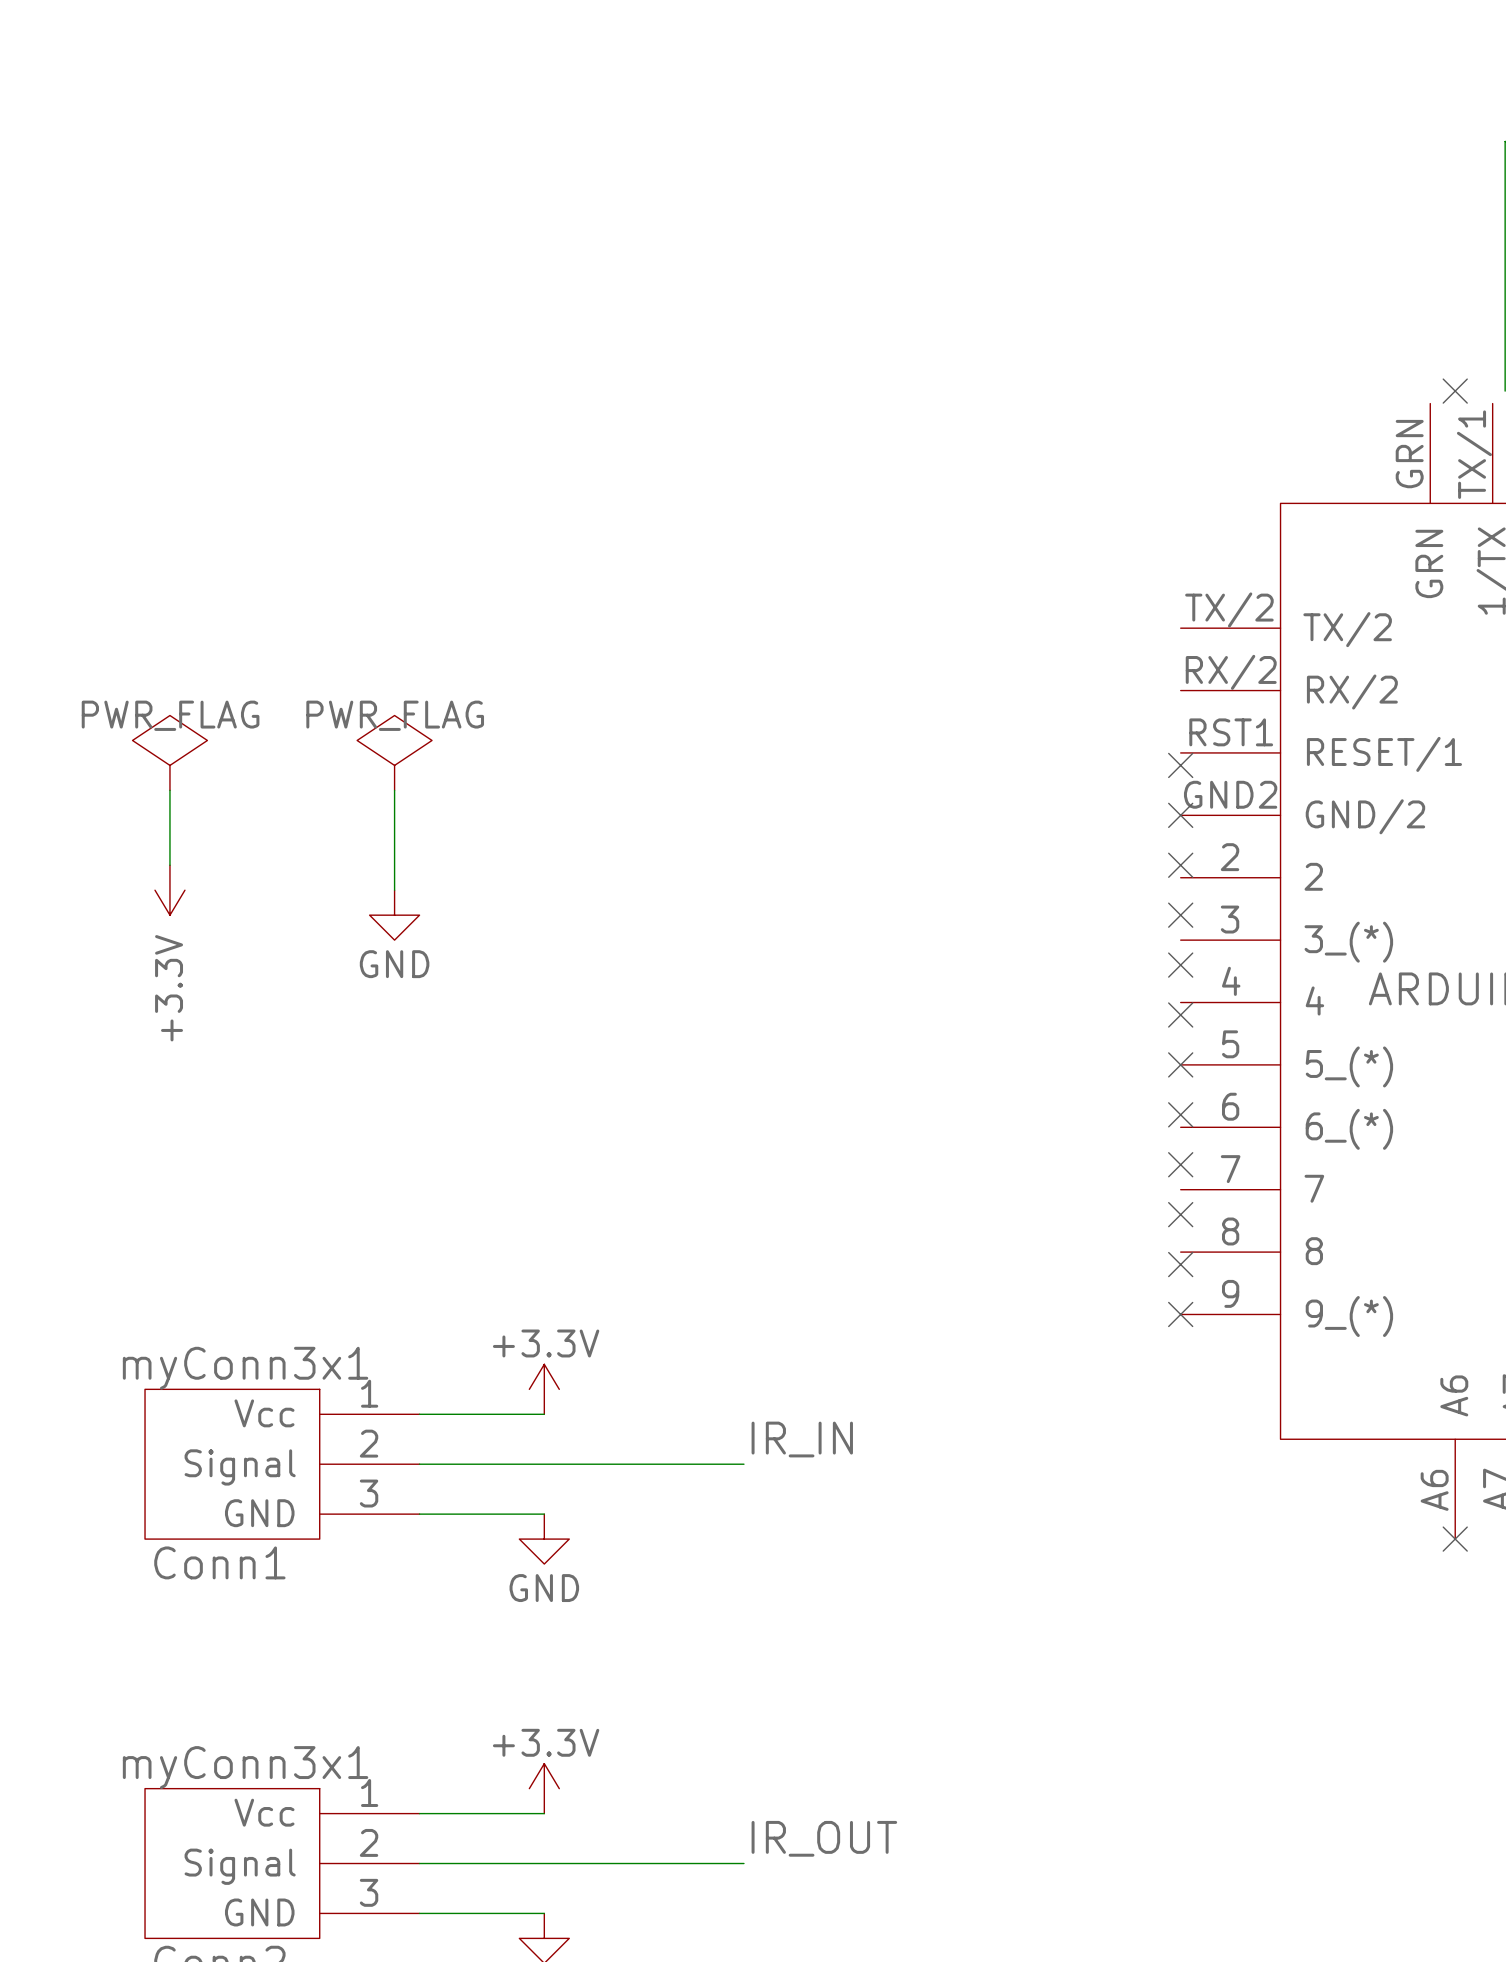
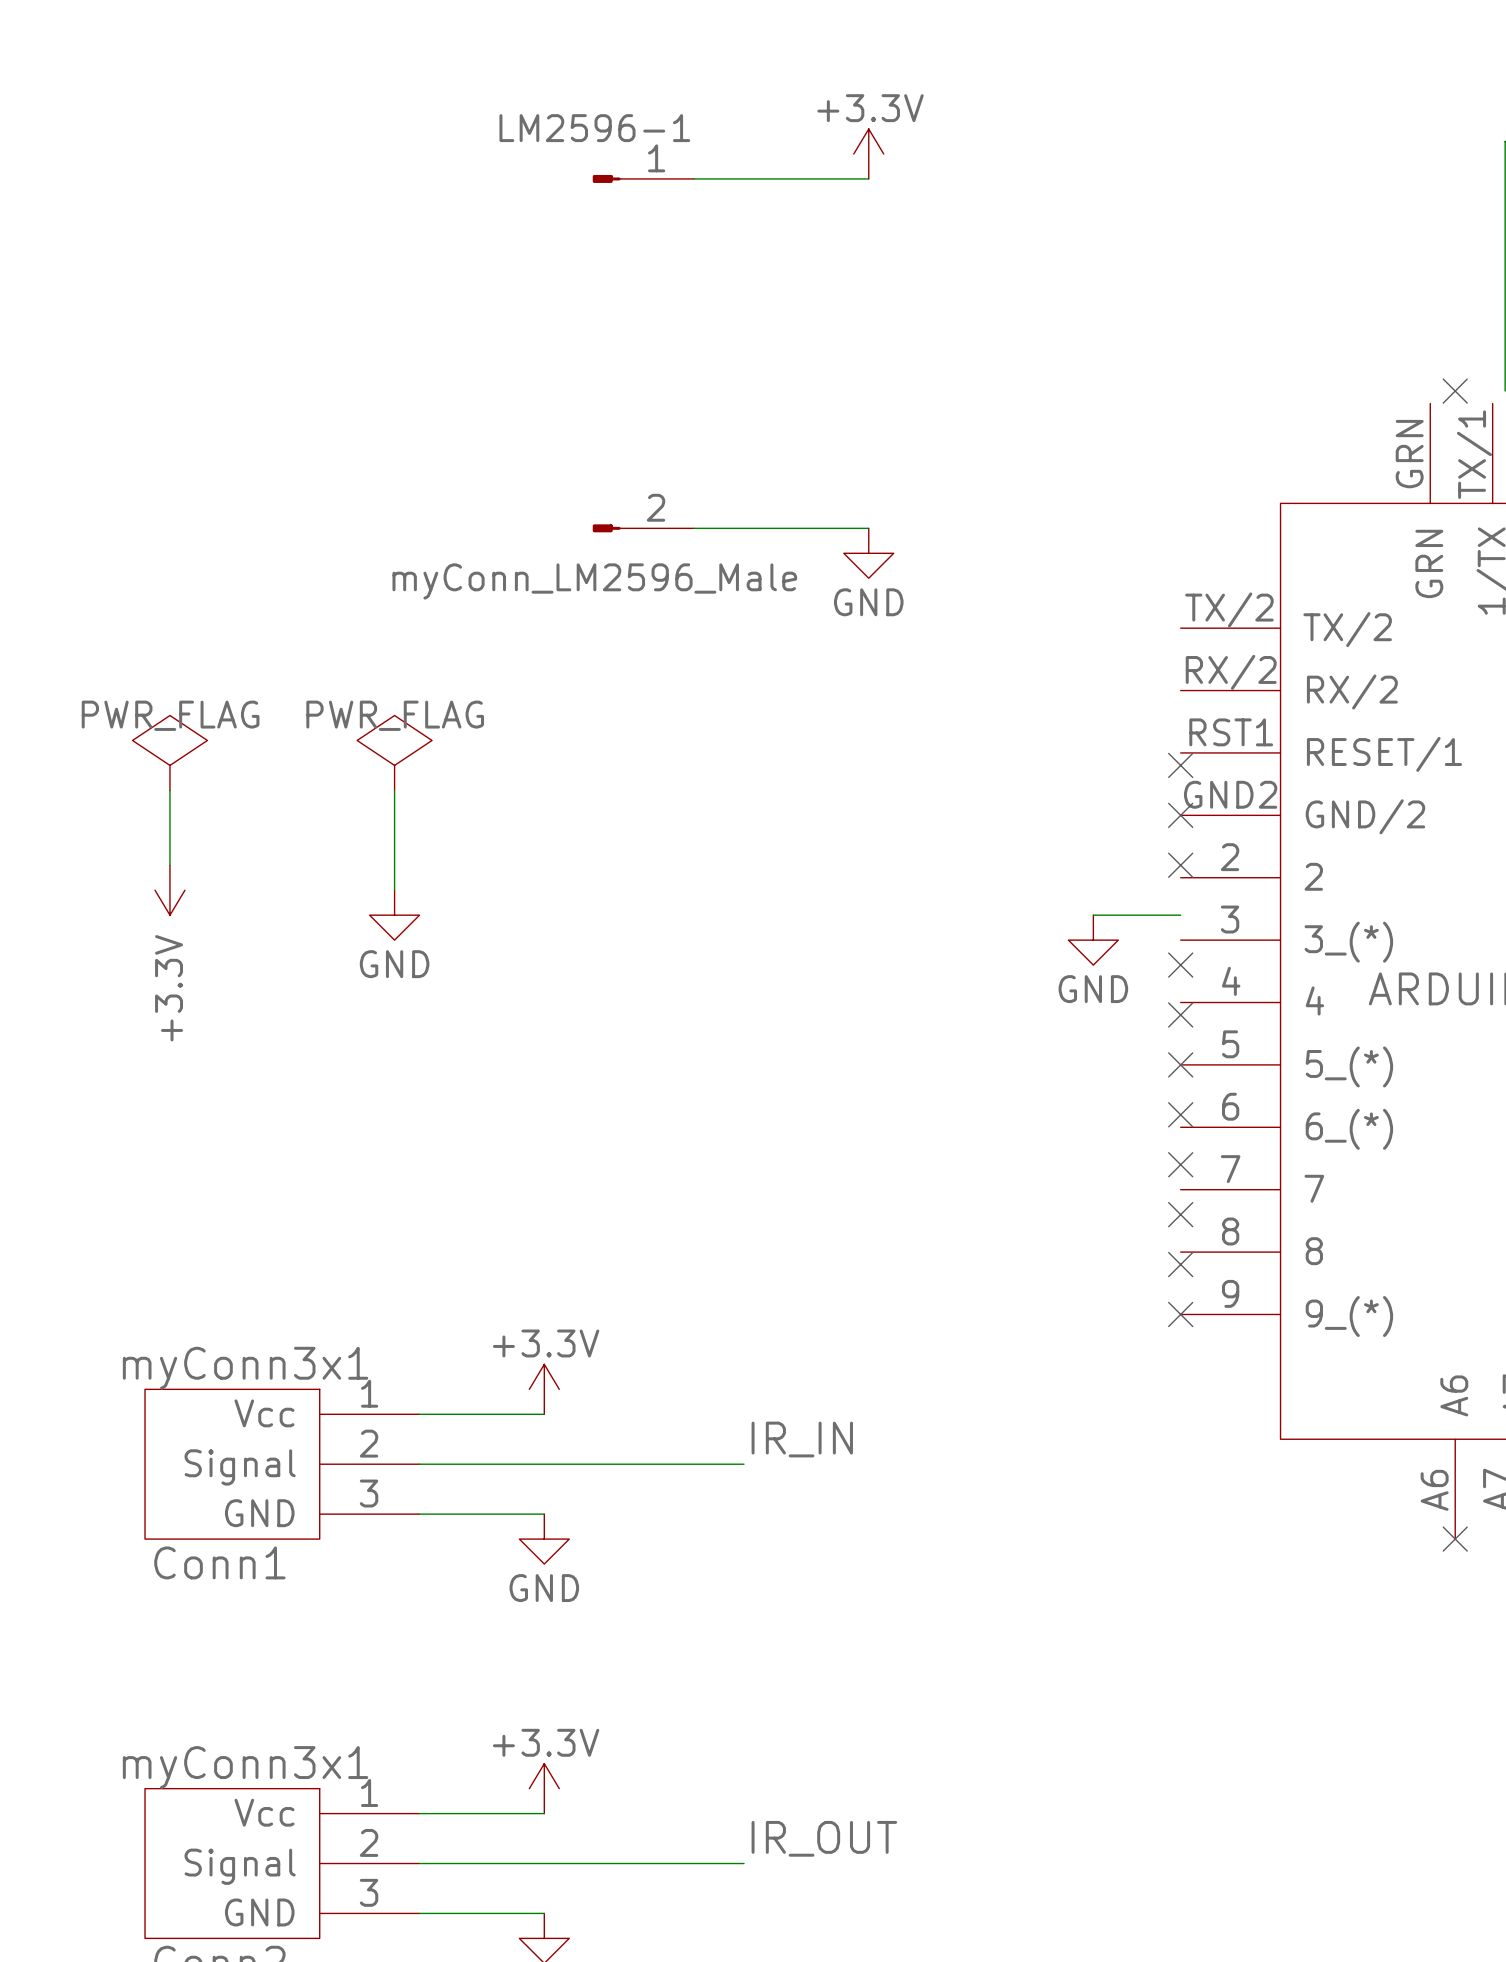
power symbol: none -> +3.3V (868, 154)
wire: none -> (694, 178) (868, 178)
LM2596-1: none -> myConn_LM2596_Male (643, 353)
wire: none -> (694, 528) (868, 528)
power symbol: none -> GND (868, 553)
wire: none -> (1093, 915) (1180, 915)
no-connect mark: (1180, 915) -> none
power symbol: none -> GND (1093, 940)

